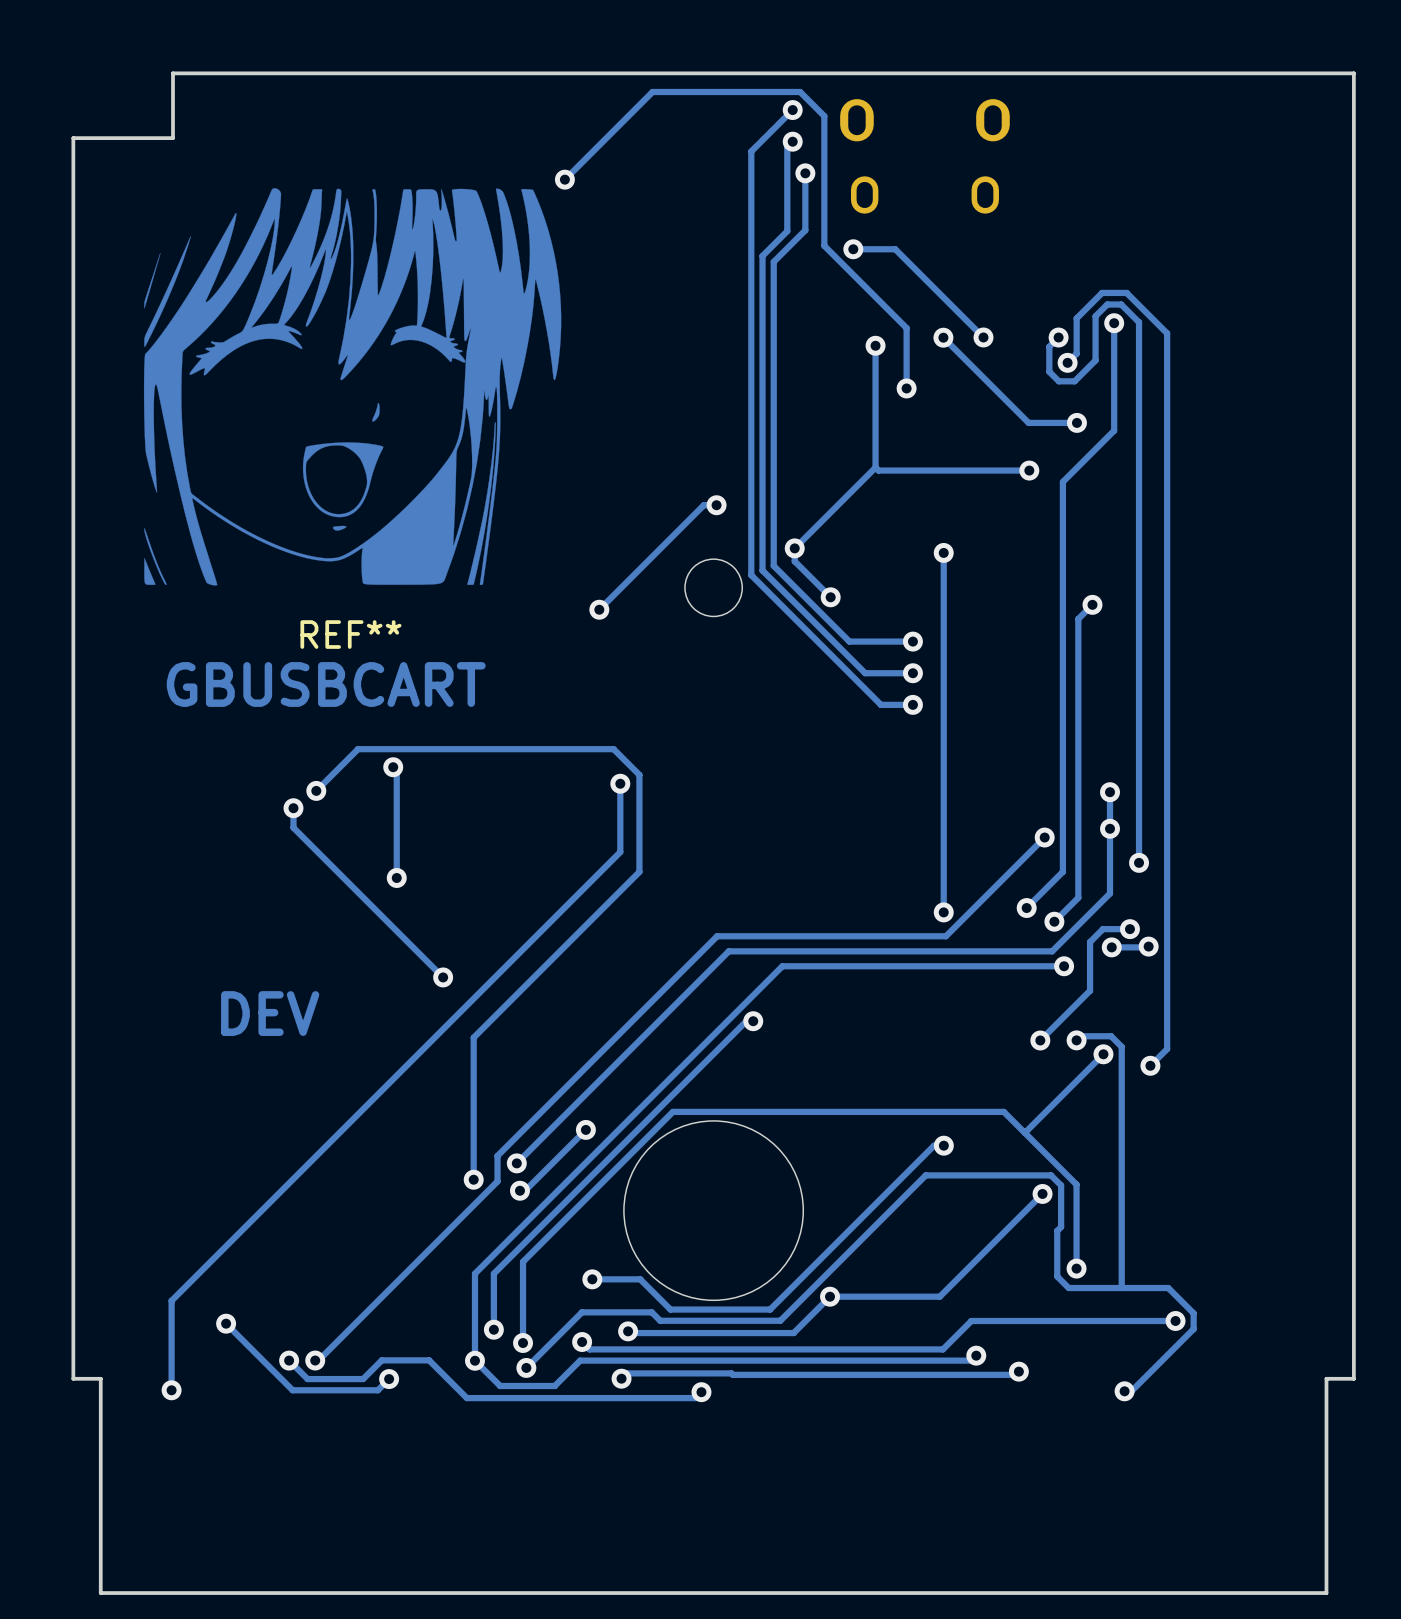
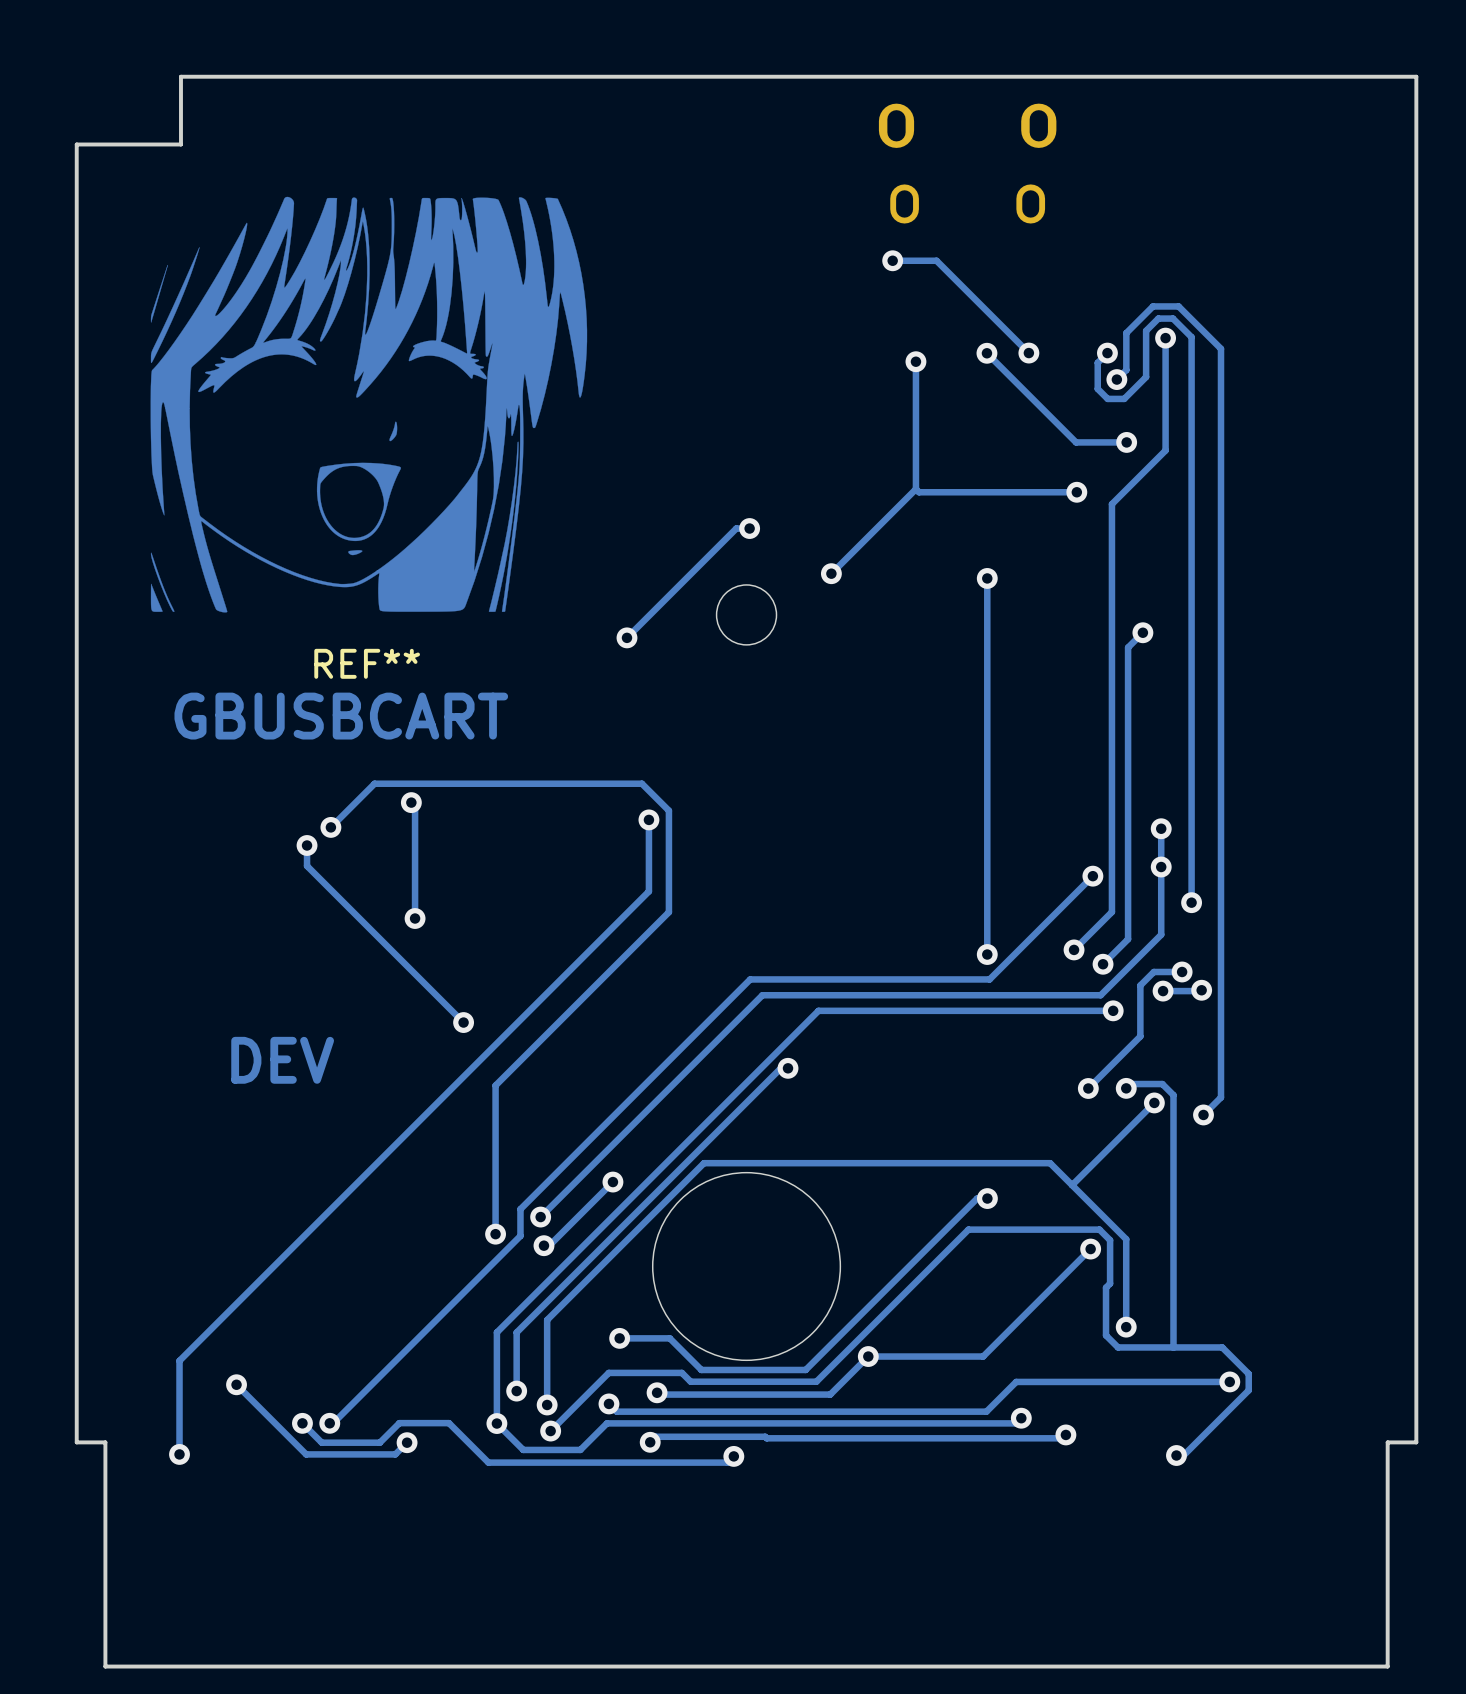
track: (792, 110) (751, 151) (751, 575) (881, 704) (912, 704) -> none
via: (792, 110) -> none
track: (792, 141) (787, 147) (787, 231) (762, 255) (762, 570) (865, 673) (912, 673) -> none
via: (792, 141) -> none
track: (805, 173) (805, 230) (773, 261) (773, 565) (849, 641) (912, 641) -> none
via: (805, 173) -> none
track: (564, 179) (652, 91) (800, 91) (824, 116) (824, 245) (906, 328) (906, 388) -> none
via: (564, 179) -> none
via: (906, 388) -> none
track: (794, 548) (794, 561) (830, 597) -> none
via: (830, 597) -> none
via: (912, 641) -> none
via: (912, 673) -> none
via: (912, 704) -> none

